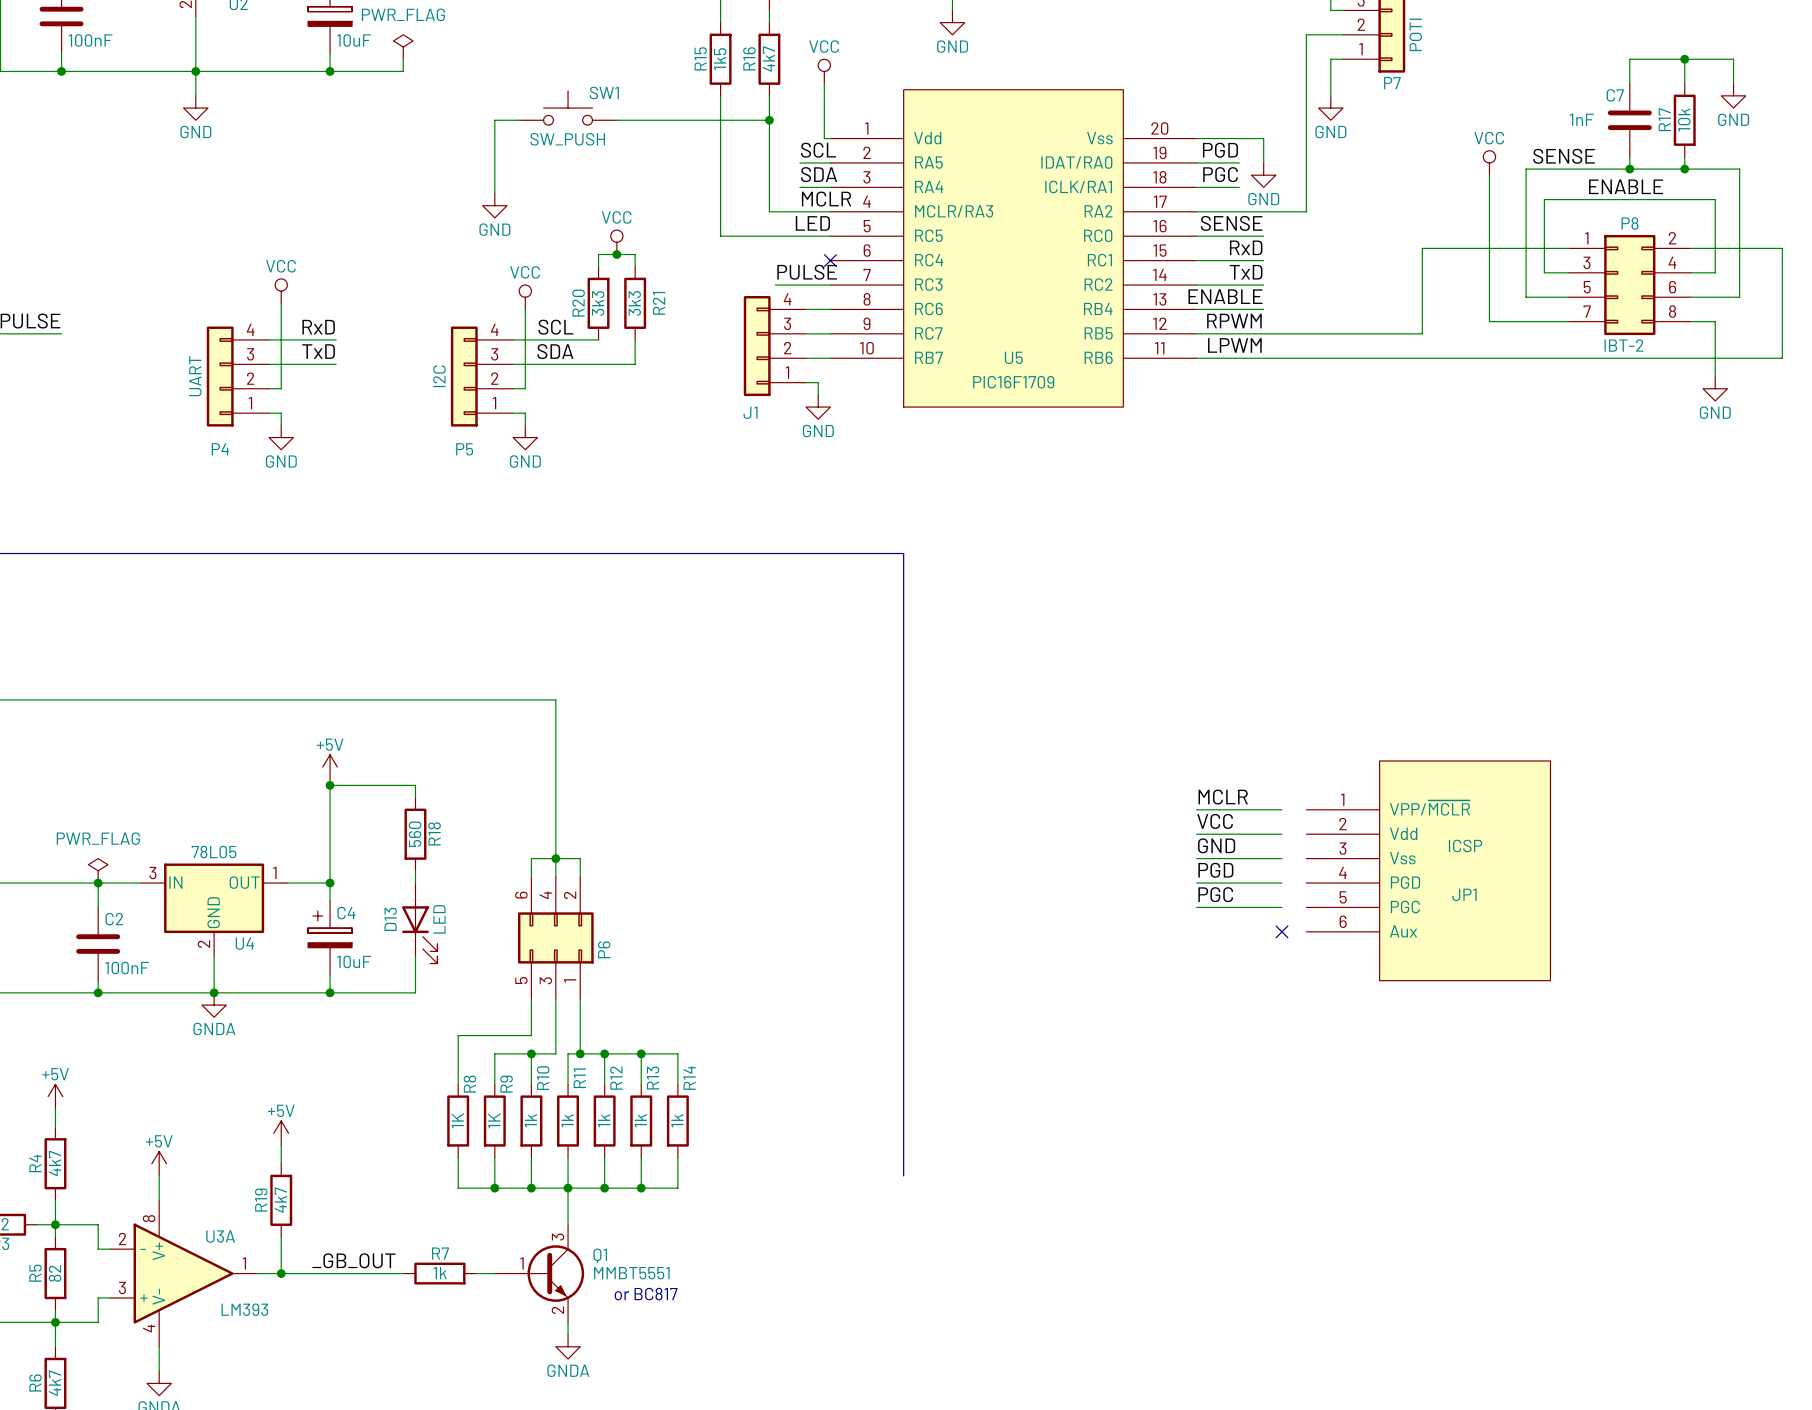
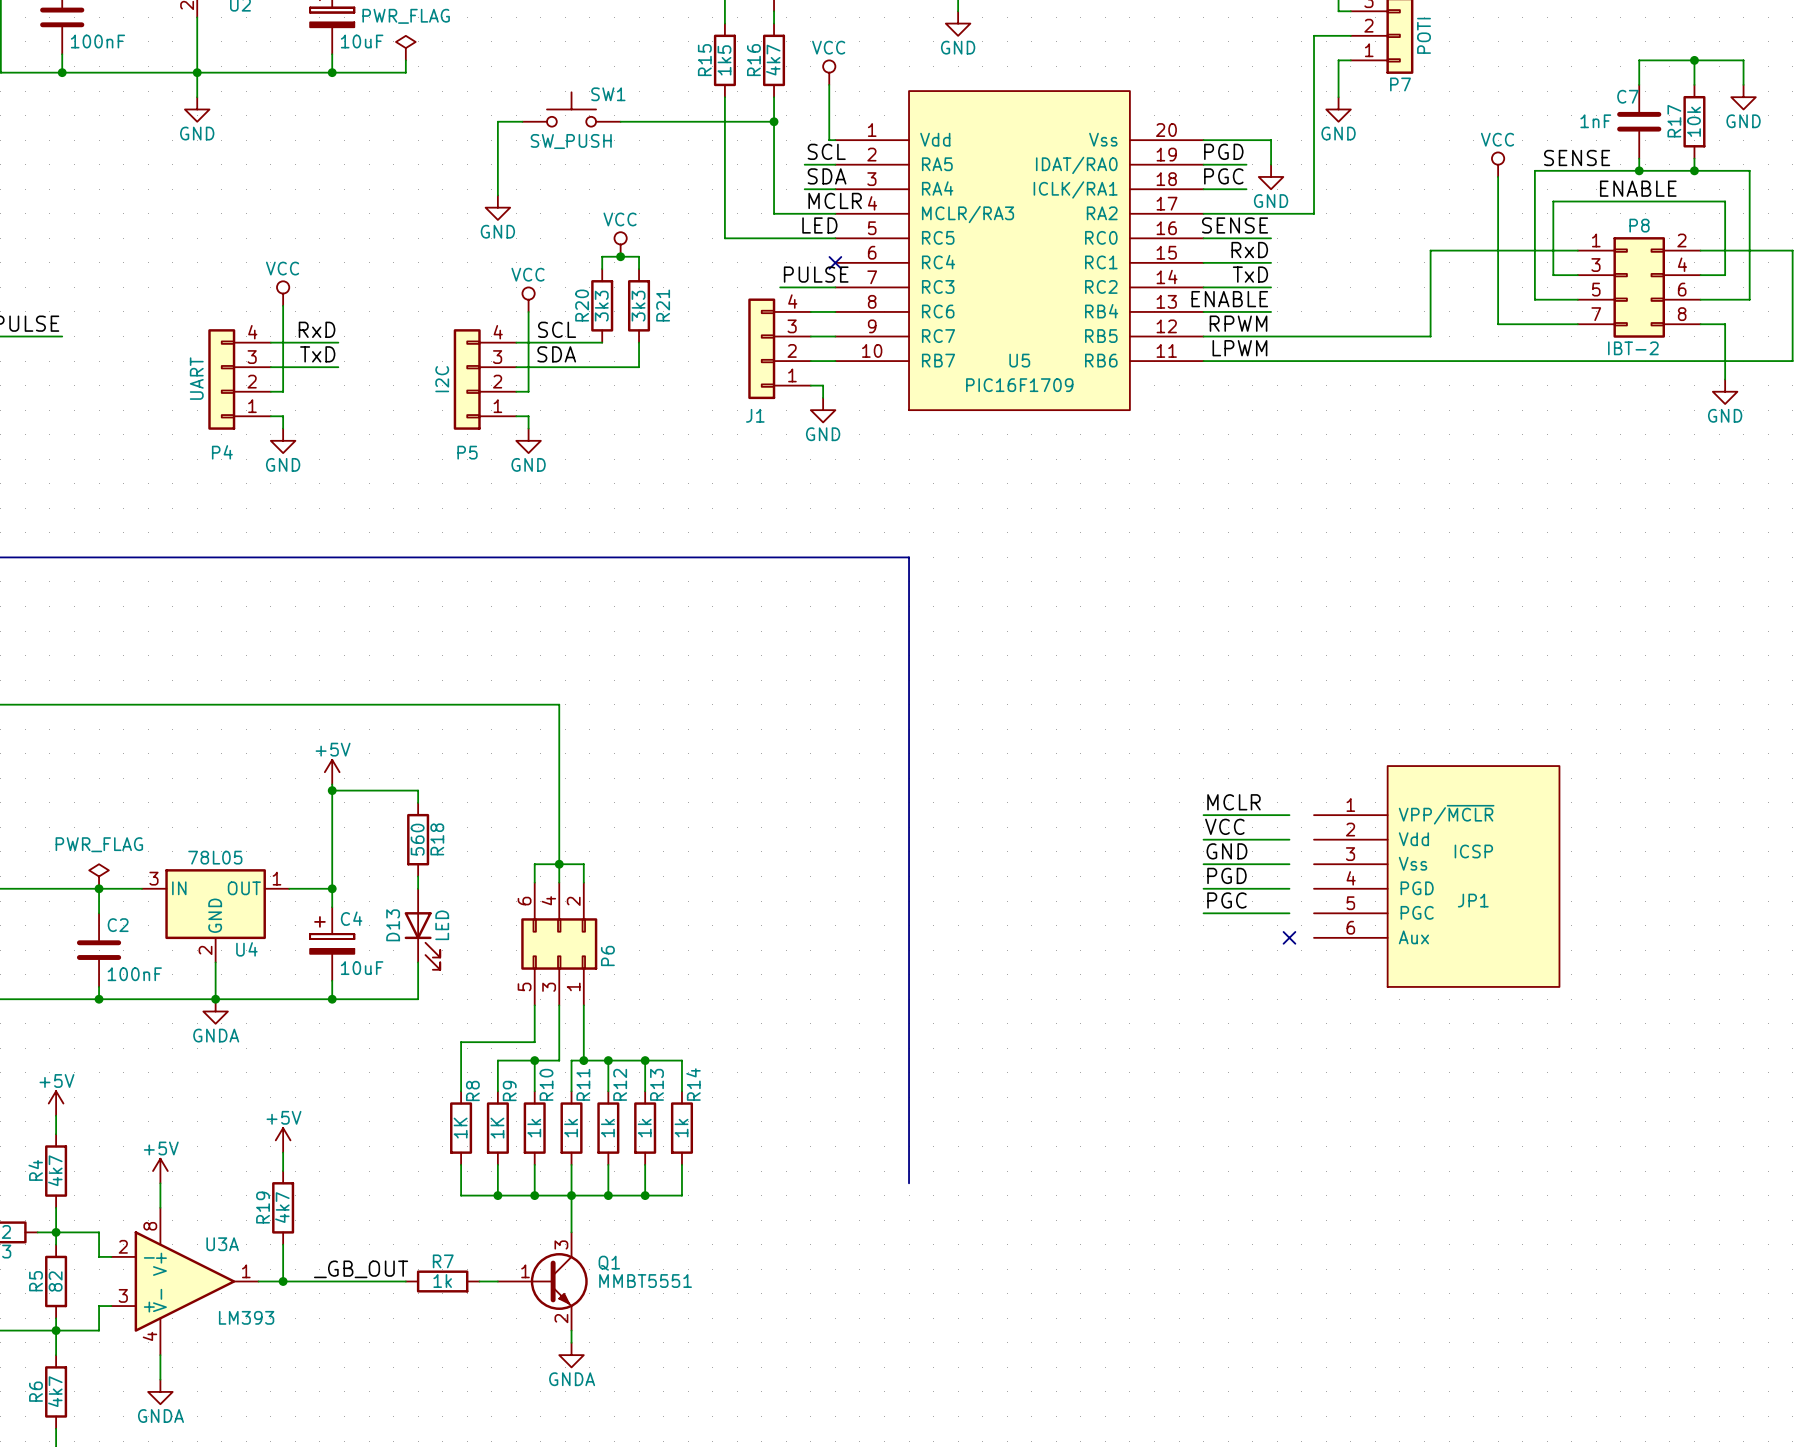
text: or BC817 (646, 1294) -> none

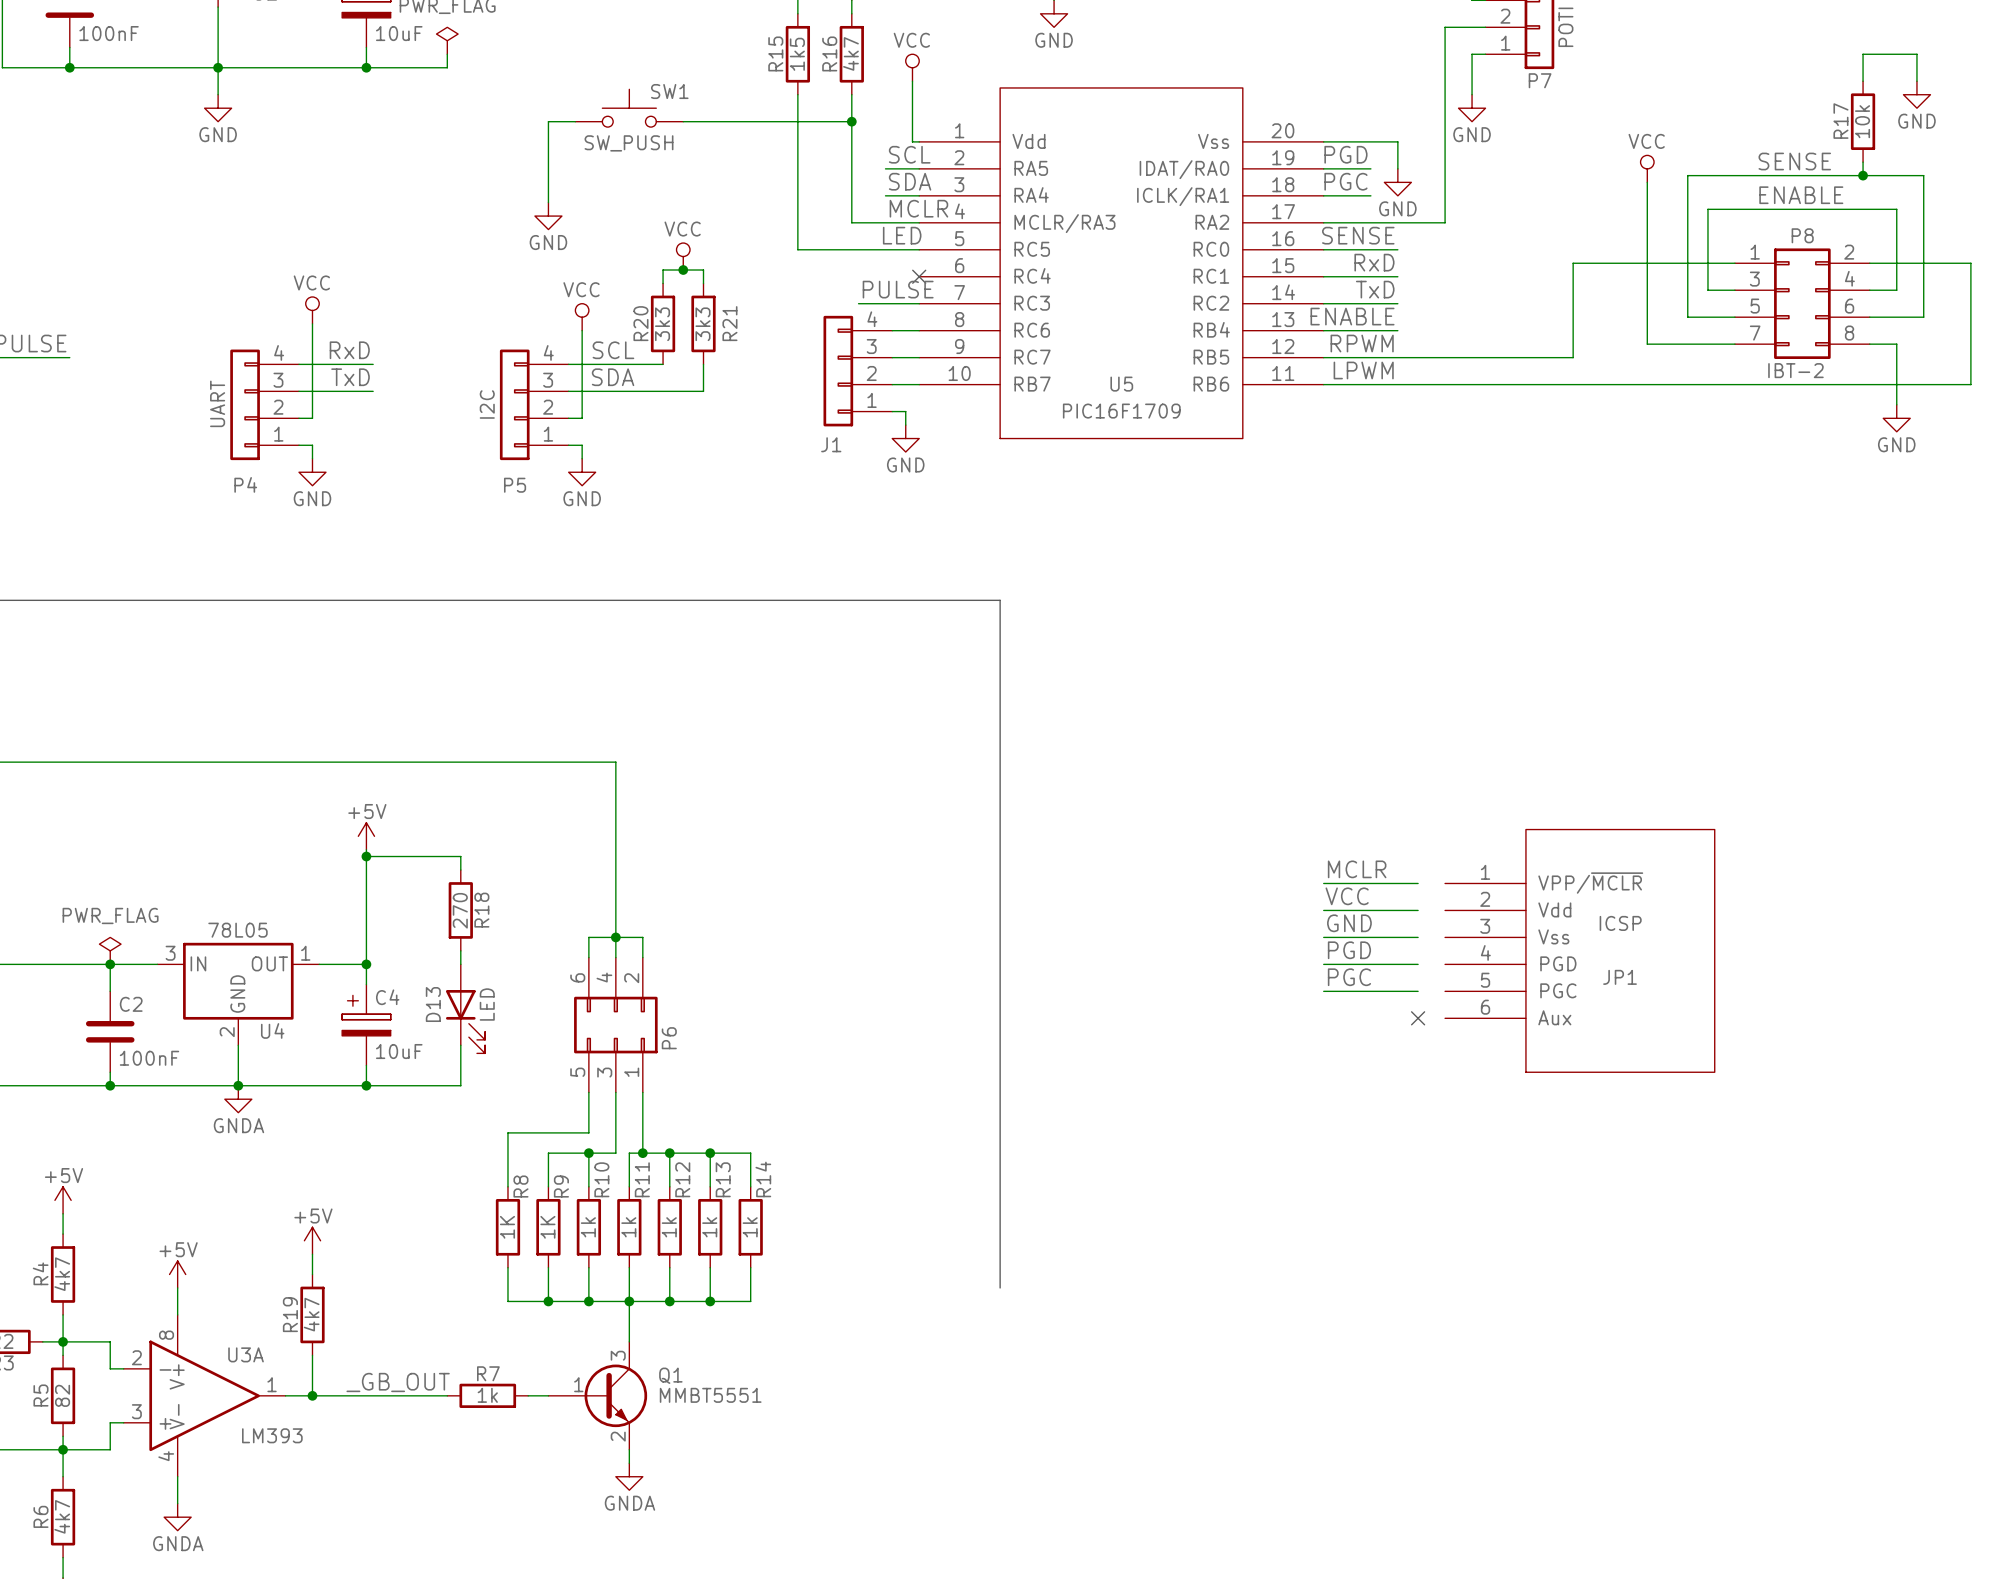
wire: (1694, 60) (1639, 60) (1639, 84) -> none
junction: (1694, 60) -> none
C7: 1nF (1639, 121) -> none
label position: SENSE (1577, 157) -> SENSE (1794, 161)
wire: (1639, 158) (1639, 170) -> none
junction: (1639, 170) -> none
R18 value: 560 (417, 839) -> 270 (460, 910)

